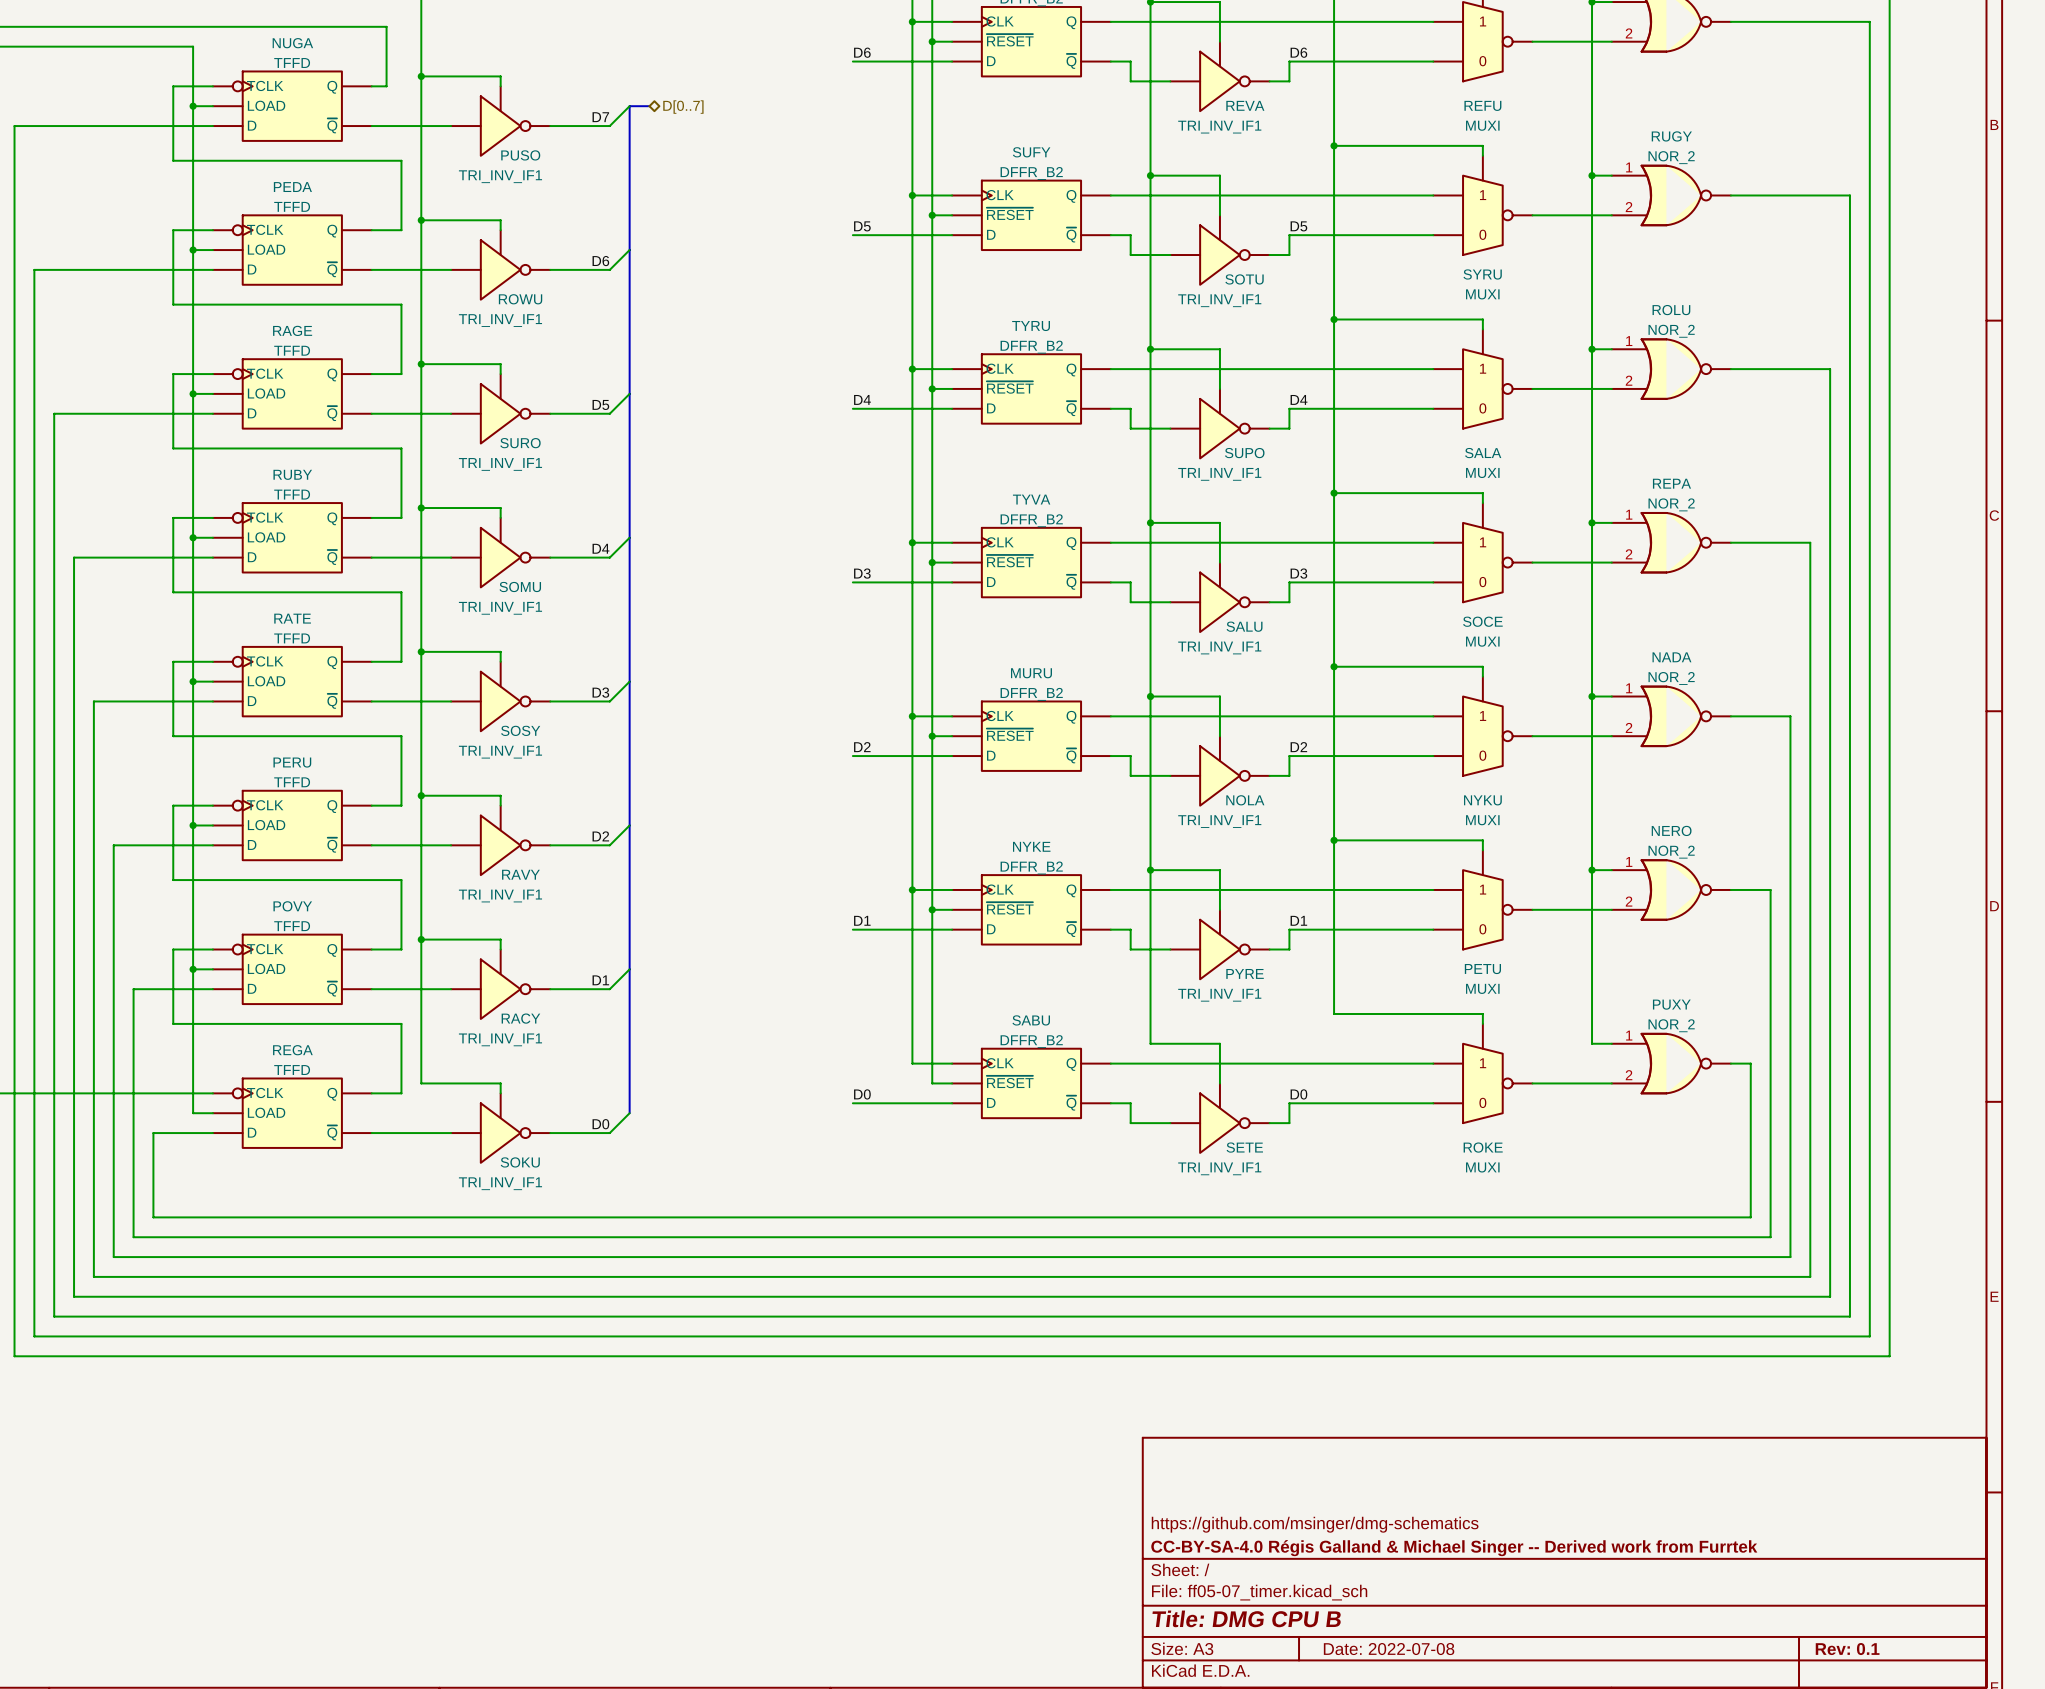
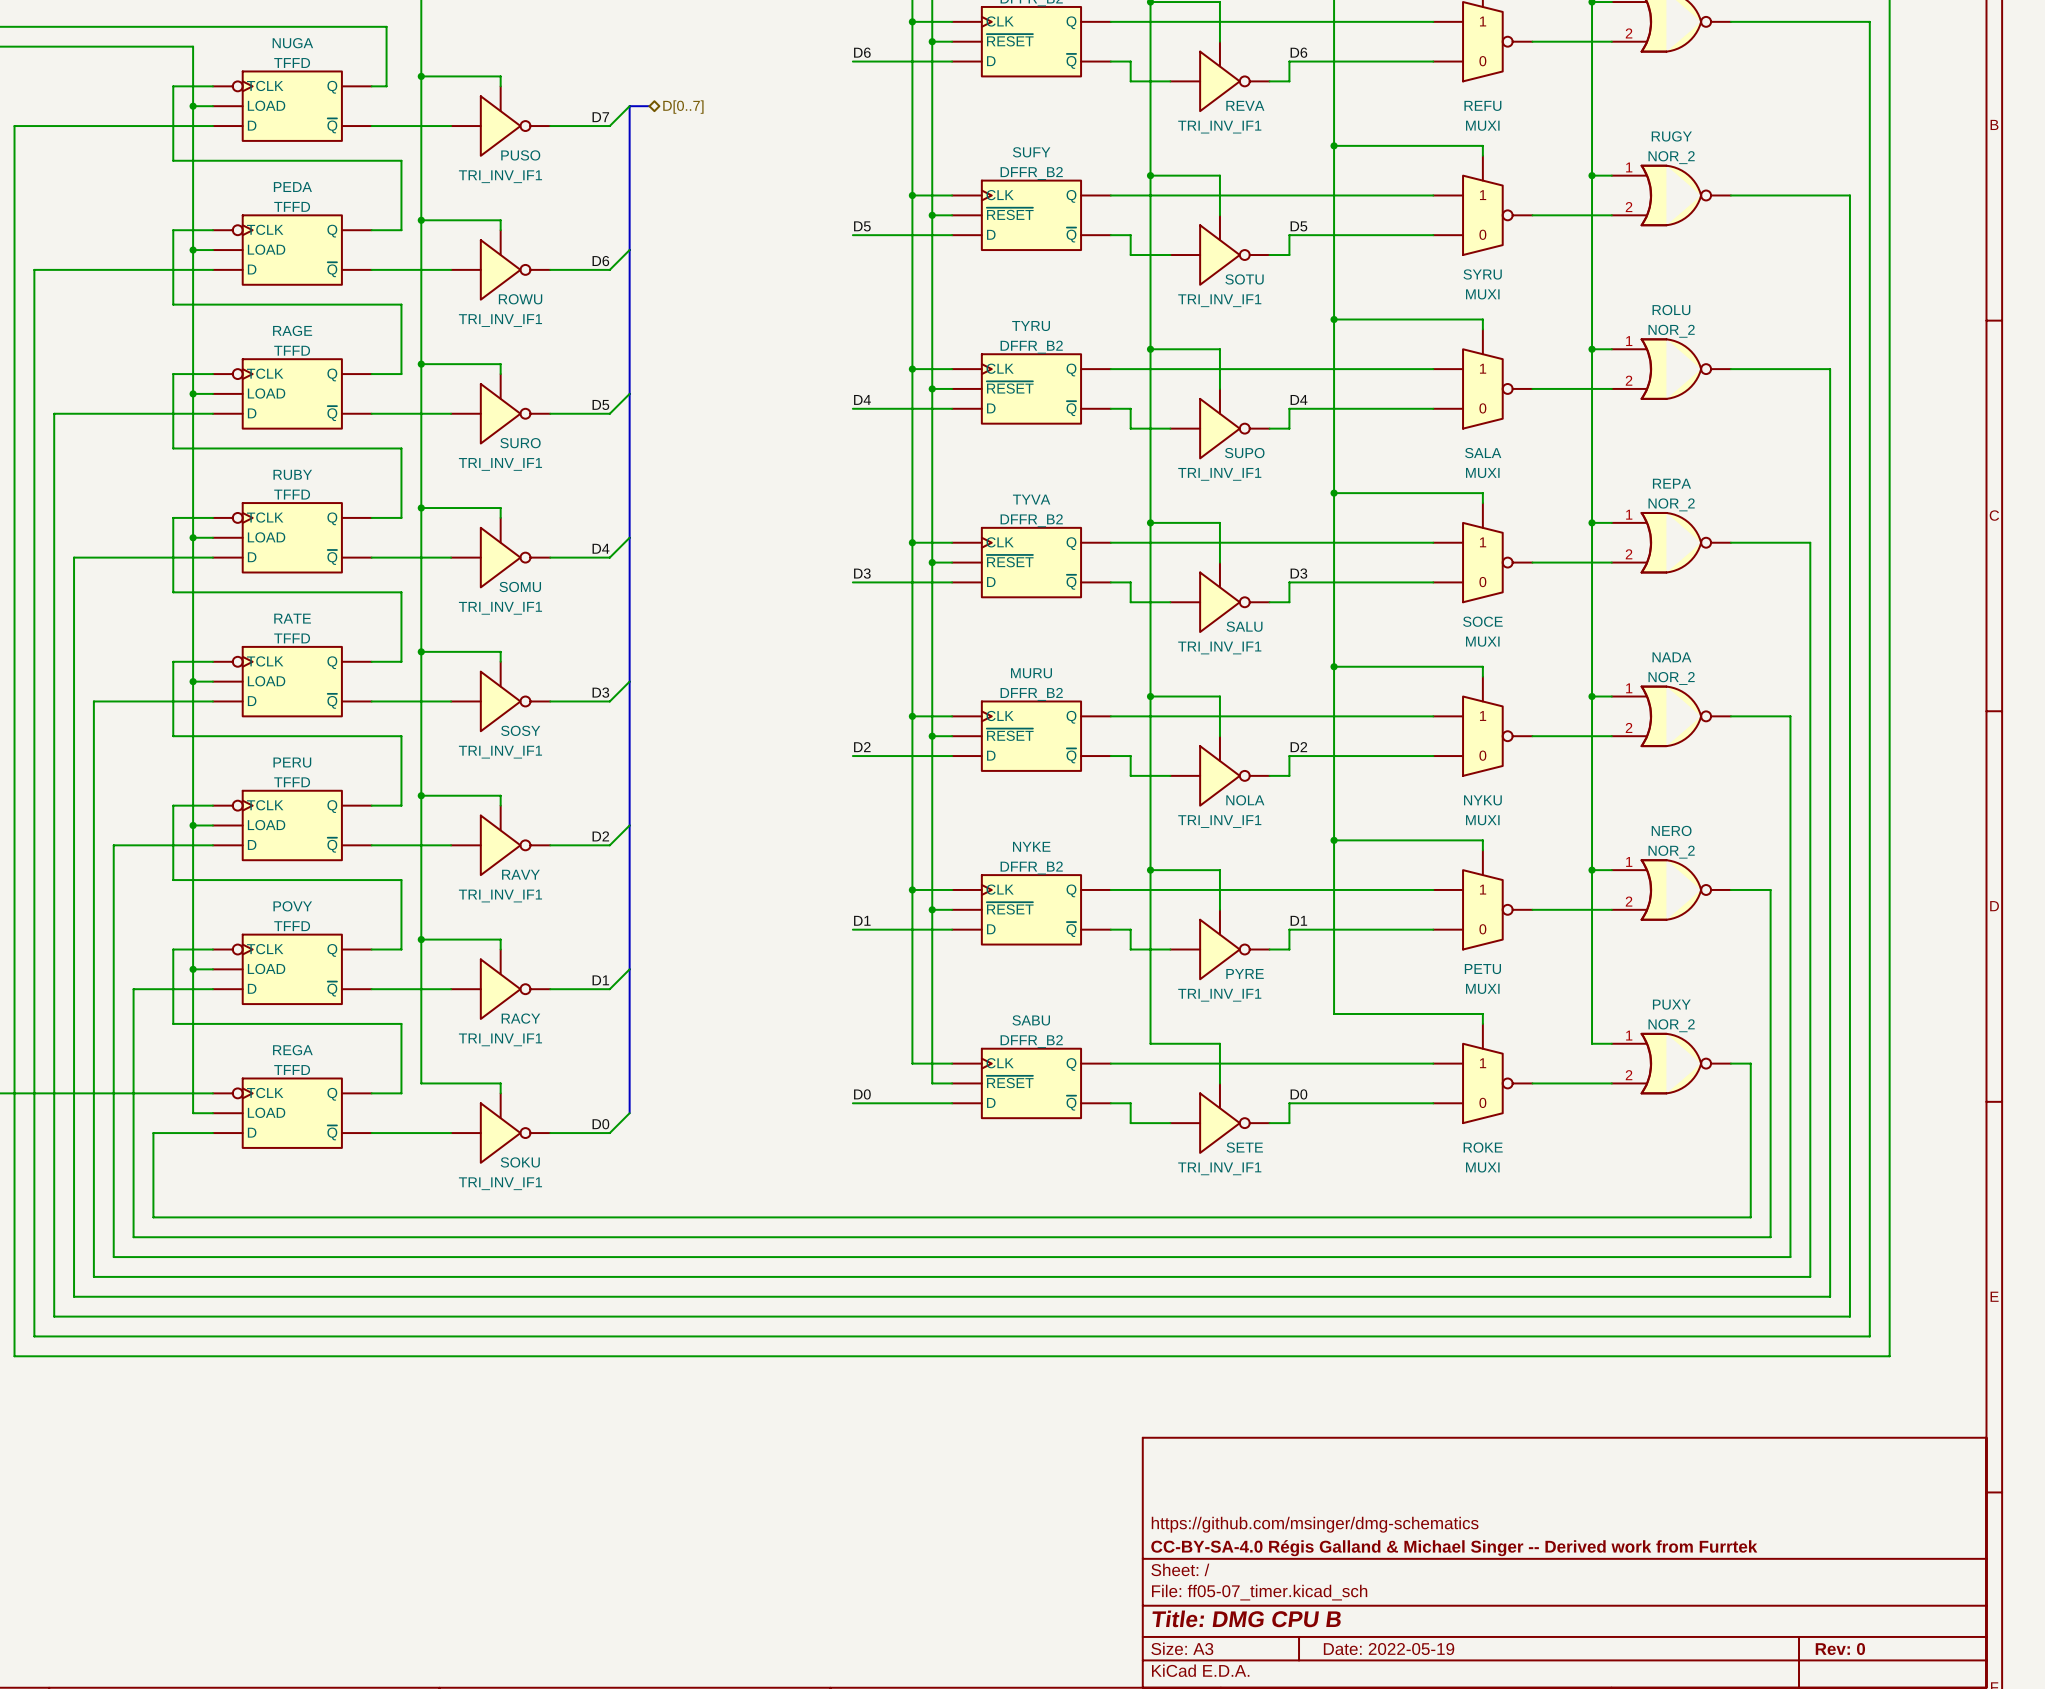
title block: Date: 2022-07-08 (1389, 1649) -> Date: 2022-05-19 (1389, 1649)
title block: Rev: 0.1 (1847, 1649) -> Rev: 0 (1840, 1649)

